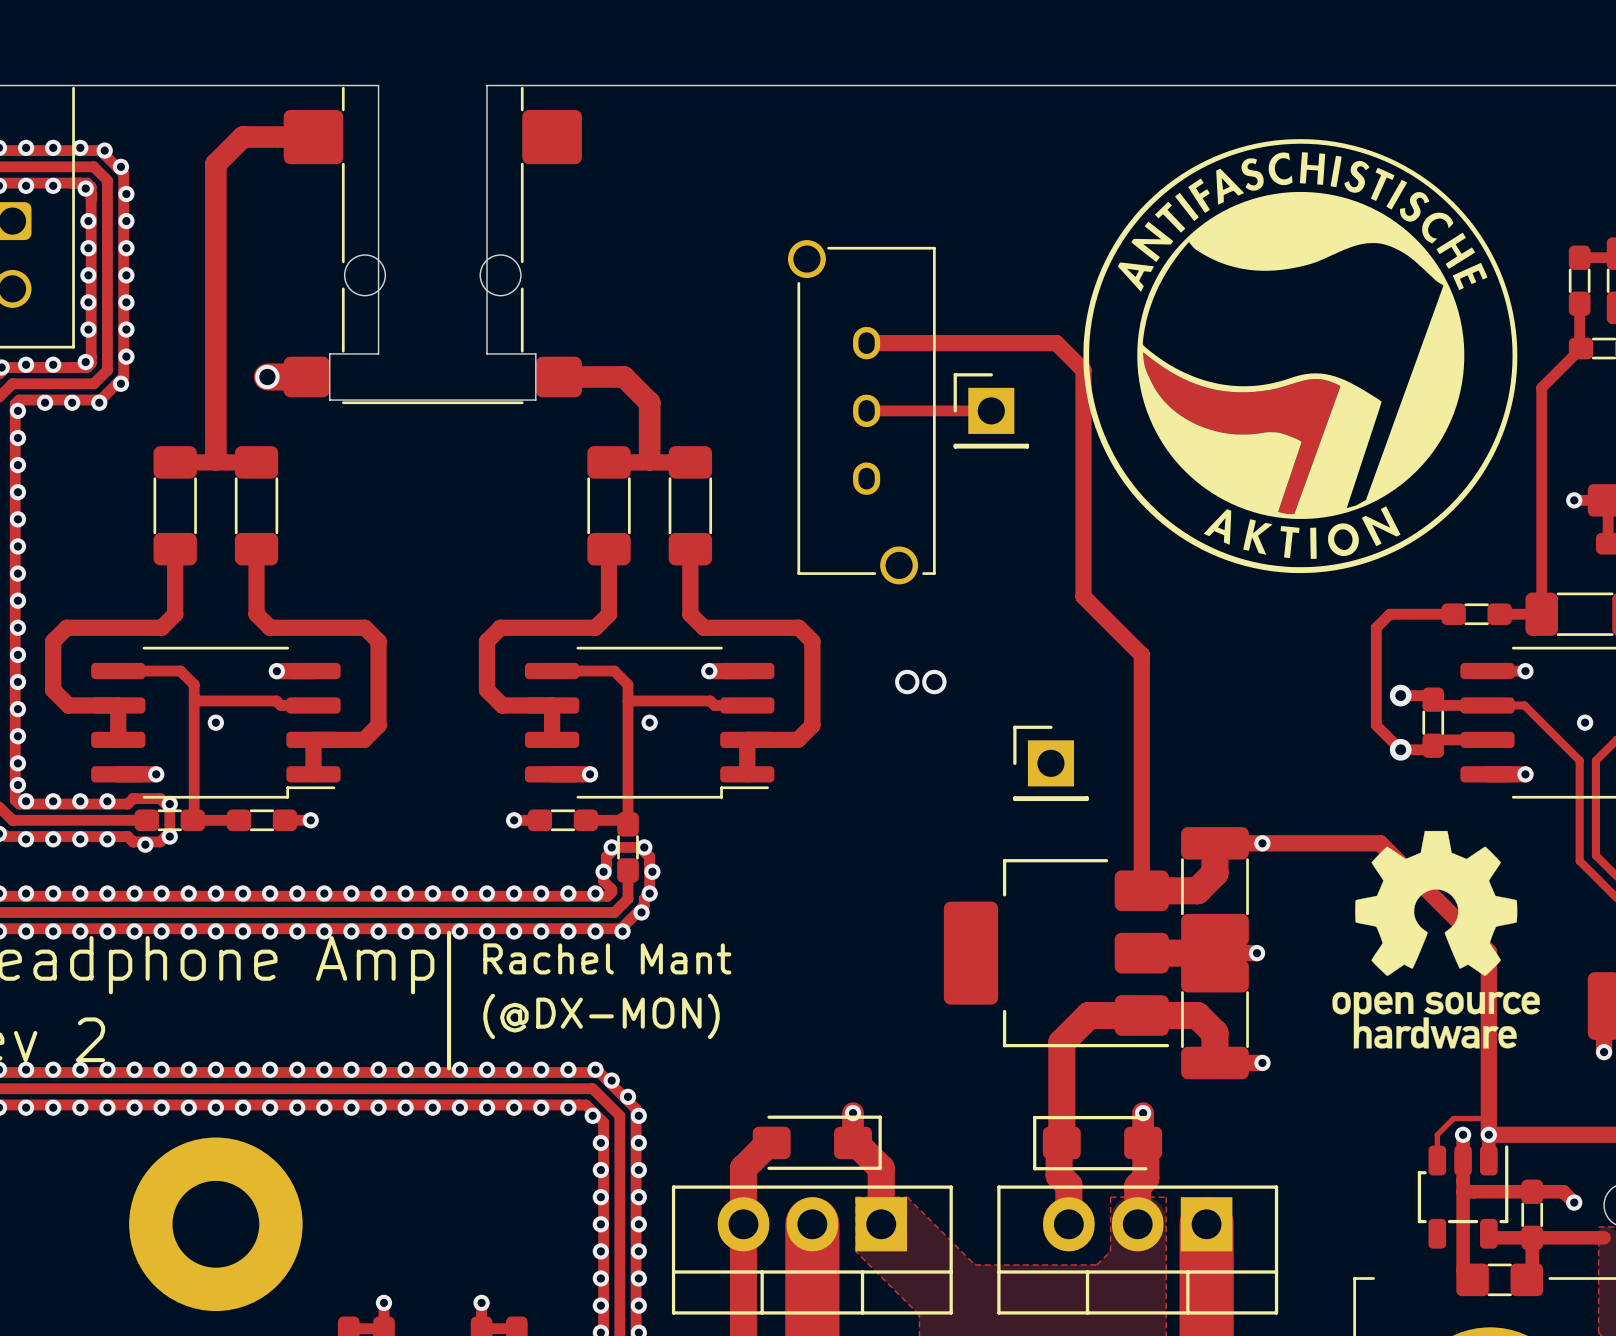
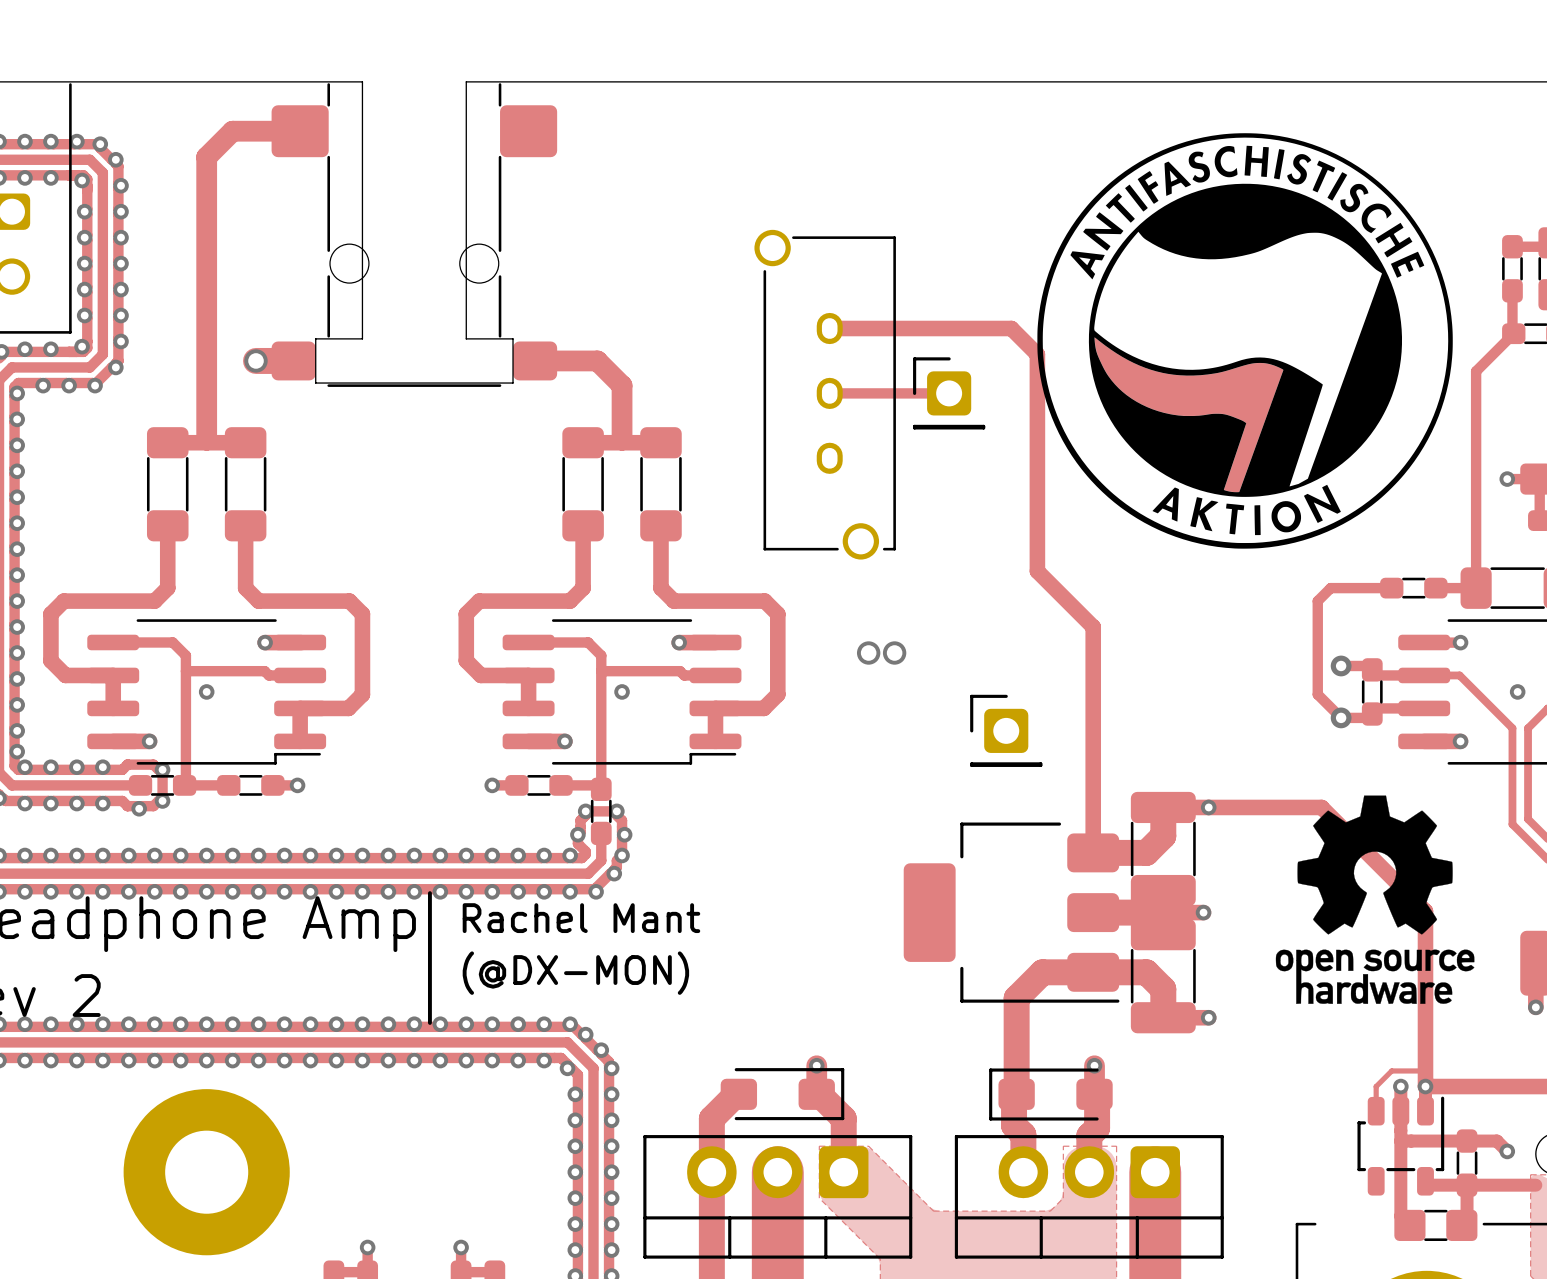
part footprint: [953, 373, 1029, 449] -> [913, 357, 986, 430]
part footprint: [1013, 725, 1089, 802] -> [970, 694, 1043, 767]
part footprint: [671, 1185, 953, 1315] -> [643, 1135, 913, 1259]
part footprint: [997, 1185, 1279, 1315] -> [954, 1135, 1224, 1259]

